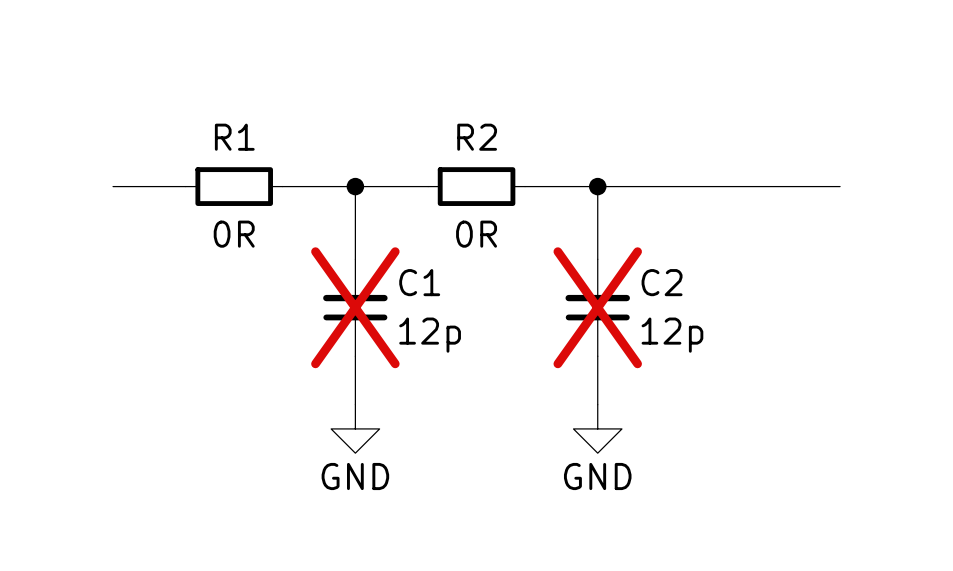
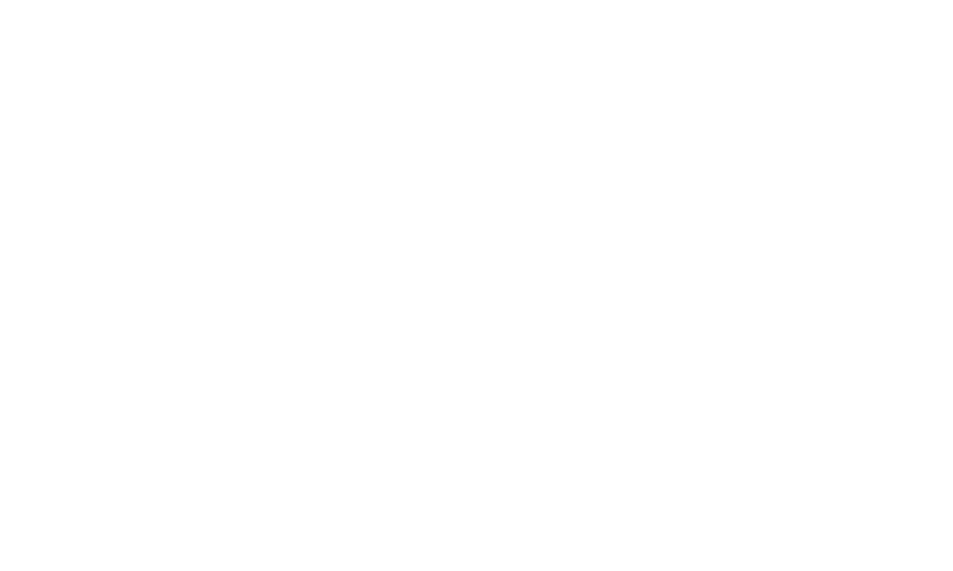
wire: (113, 186) (185, 186) -> none
R1: (234, 186) -> none
wire: (282, 186) (428, 186) -> none
wire: (355, 186) (355, 259) -> none
junction: (355, 186) -> none
R2: (476, 186) -> none
wire: (525, 186) (840, 186) -> none
wire: (597, 186) (597, 259) -> none
junction: (597, 186) -> none
C1: (355, 307) -> none
C2: (597, 307) -> none
wire: (355, 356) (355, 404) -> none
wire: (597, 356) (597, 404) -> none
power symbol: GND (355, 428) -> none
power symbol: GND (597, 428) -> none

